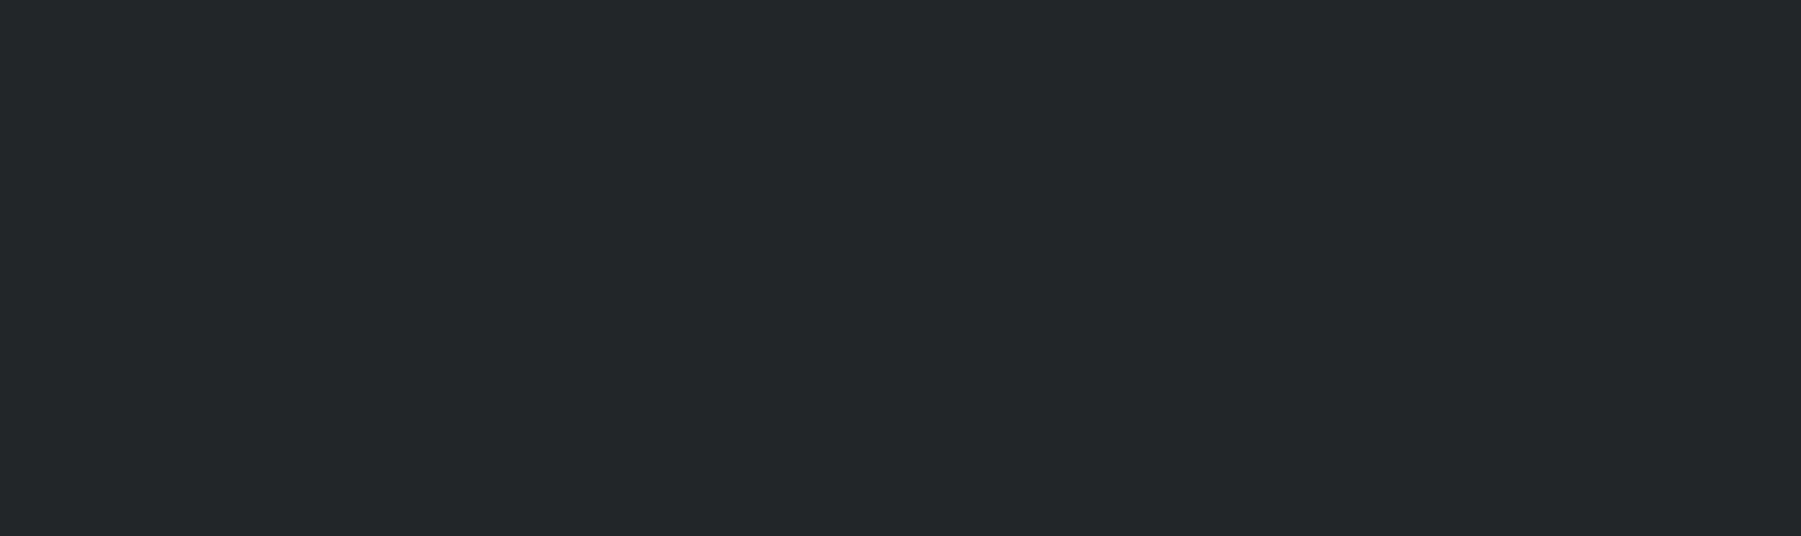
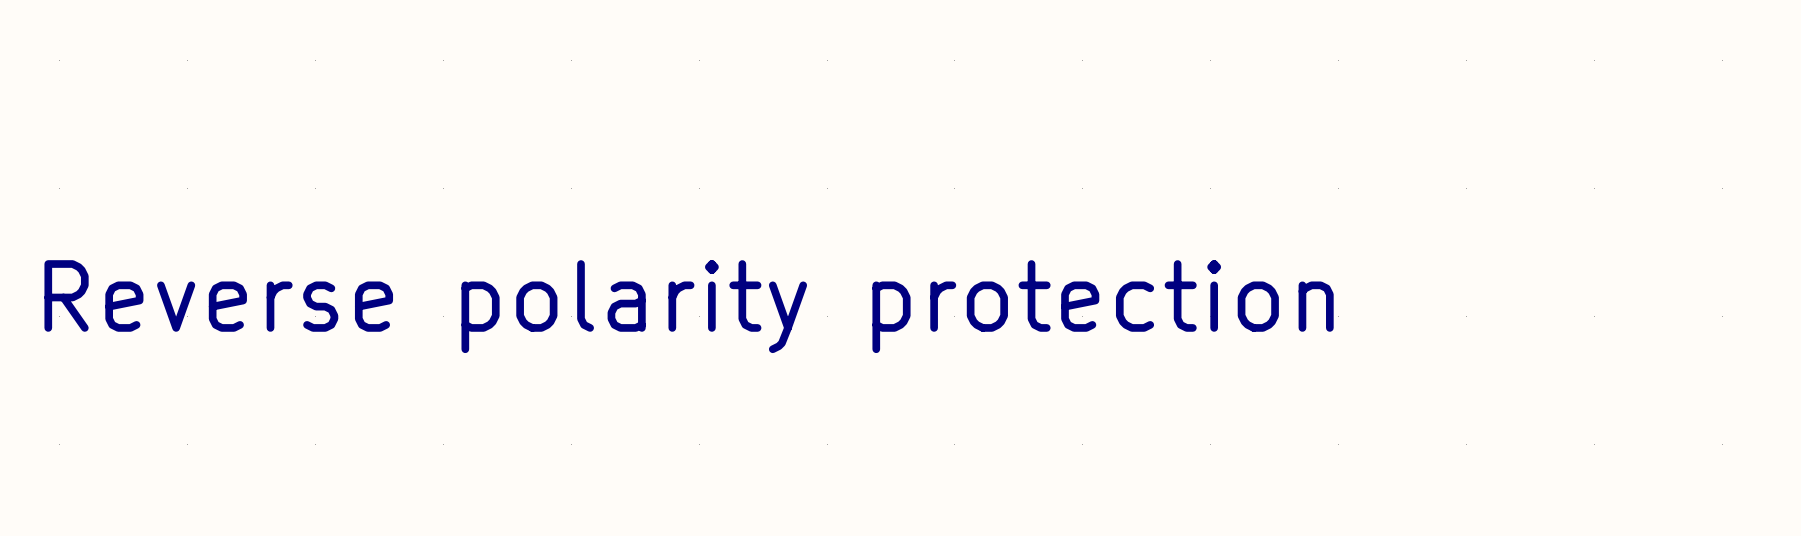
text: none -> Reverse polarity protection (689, 306)

